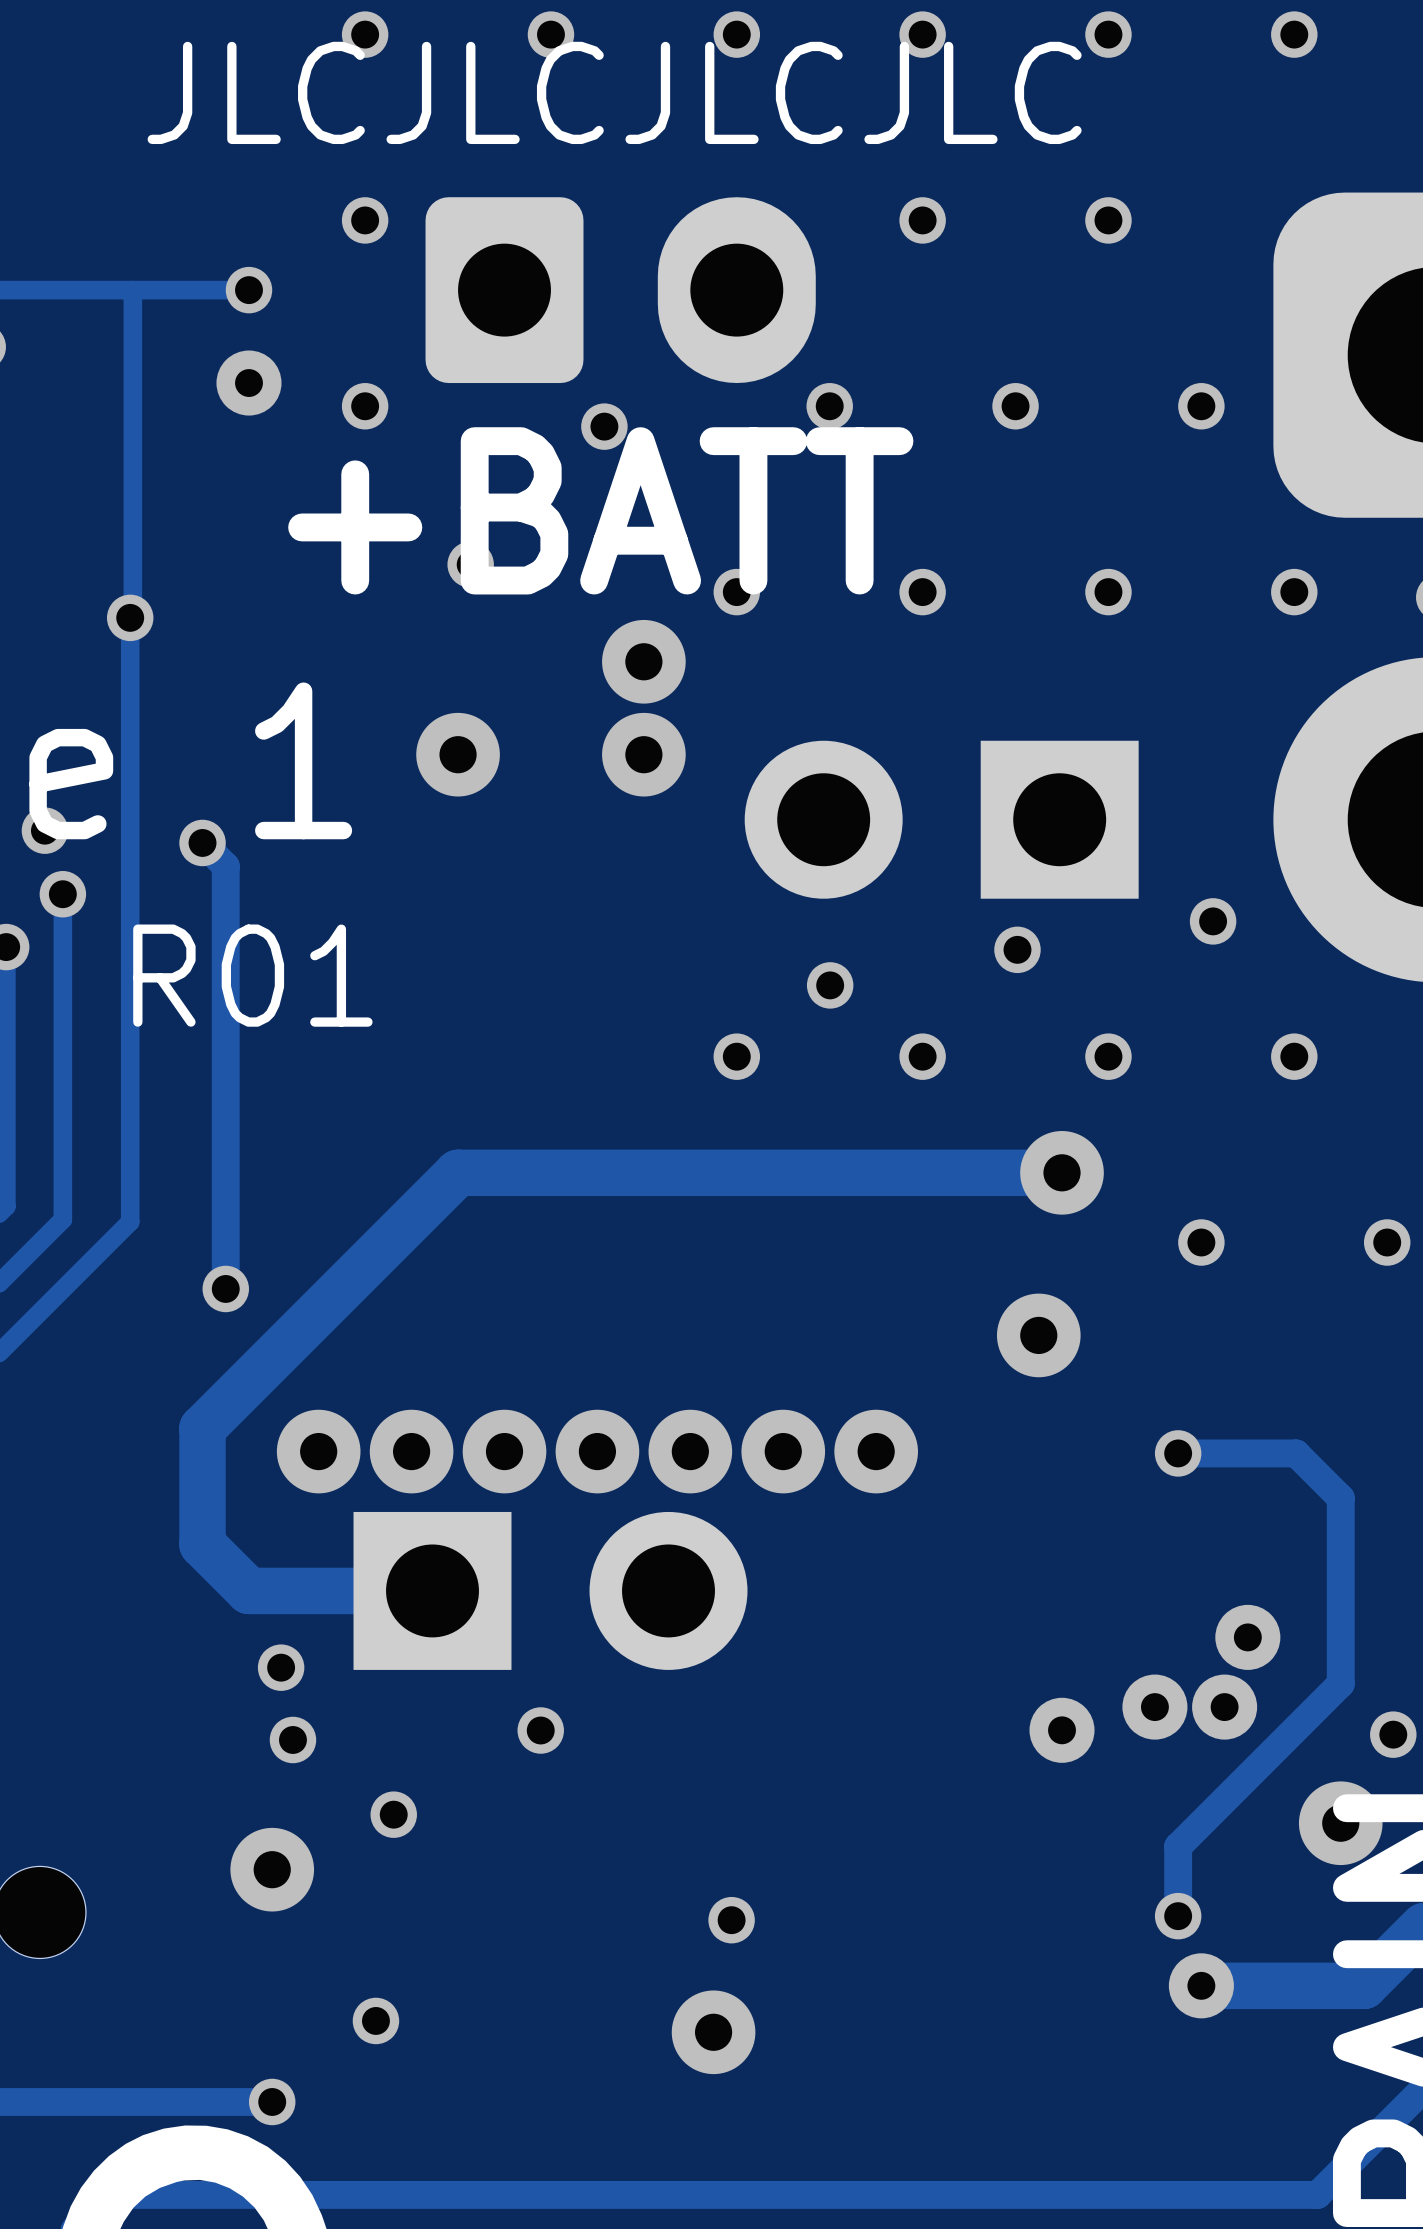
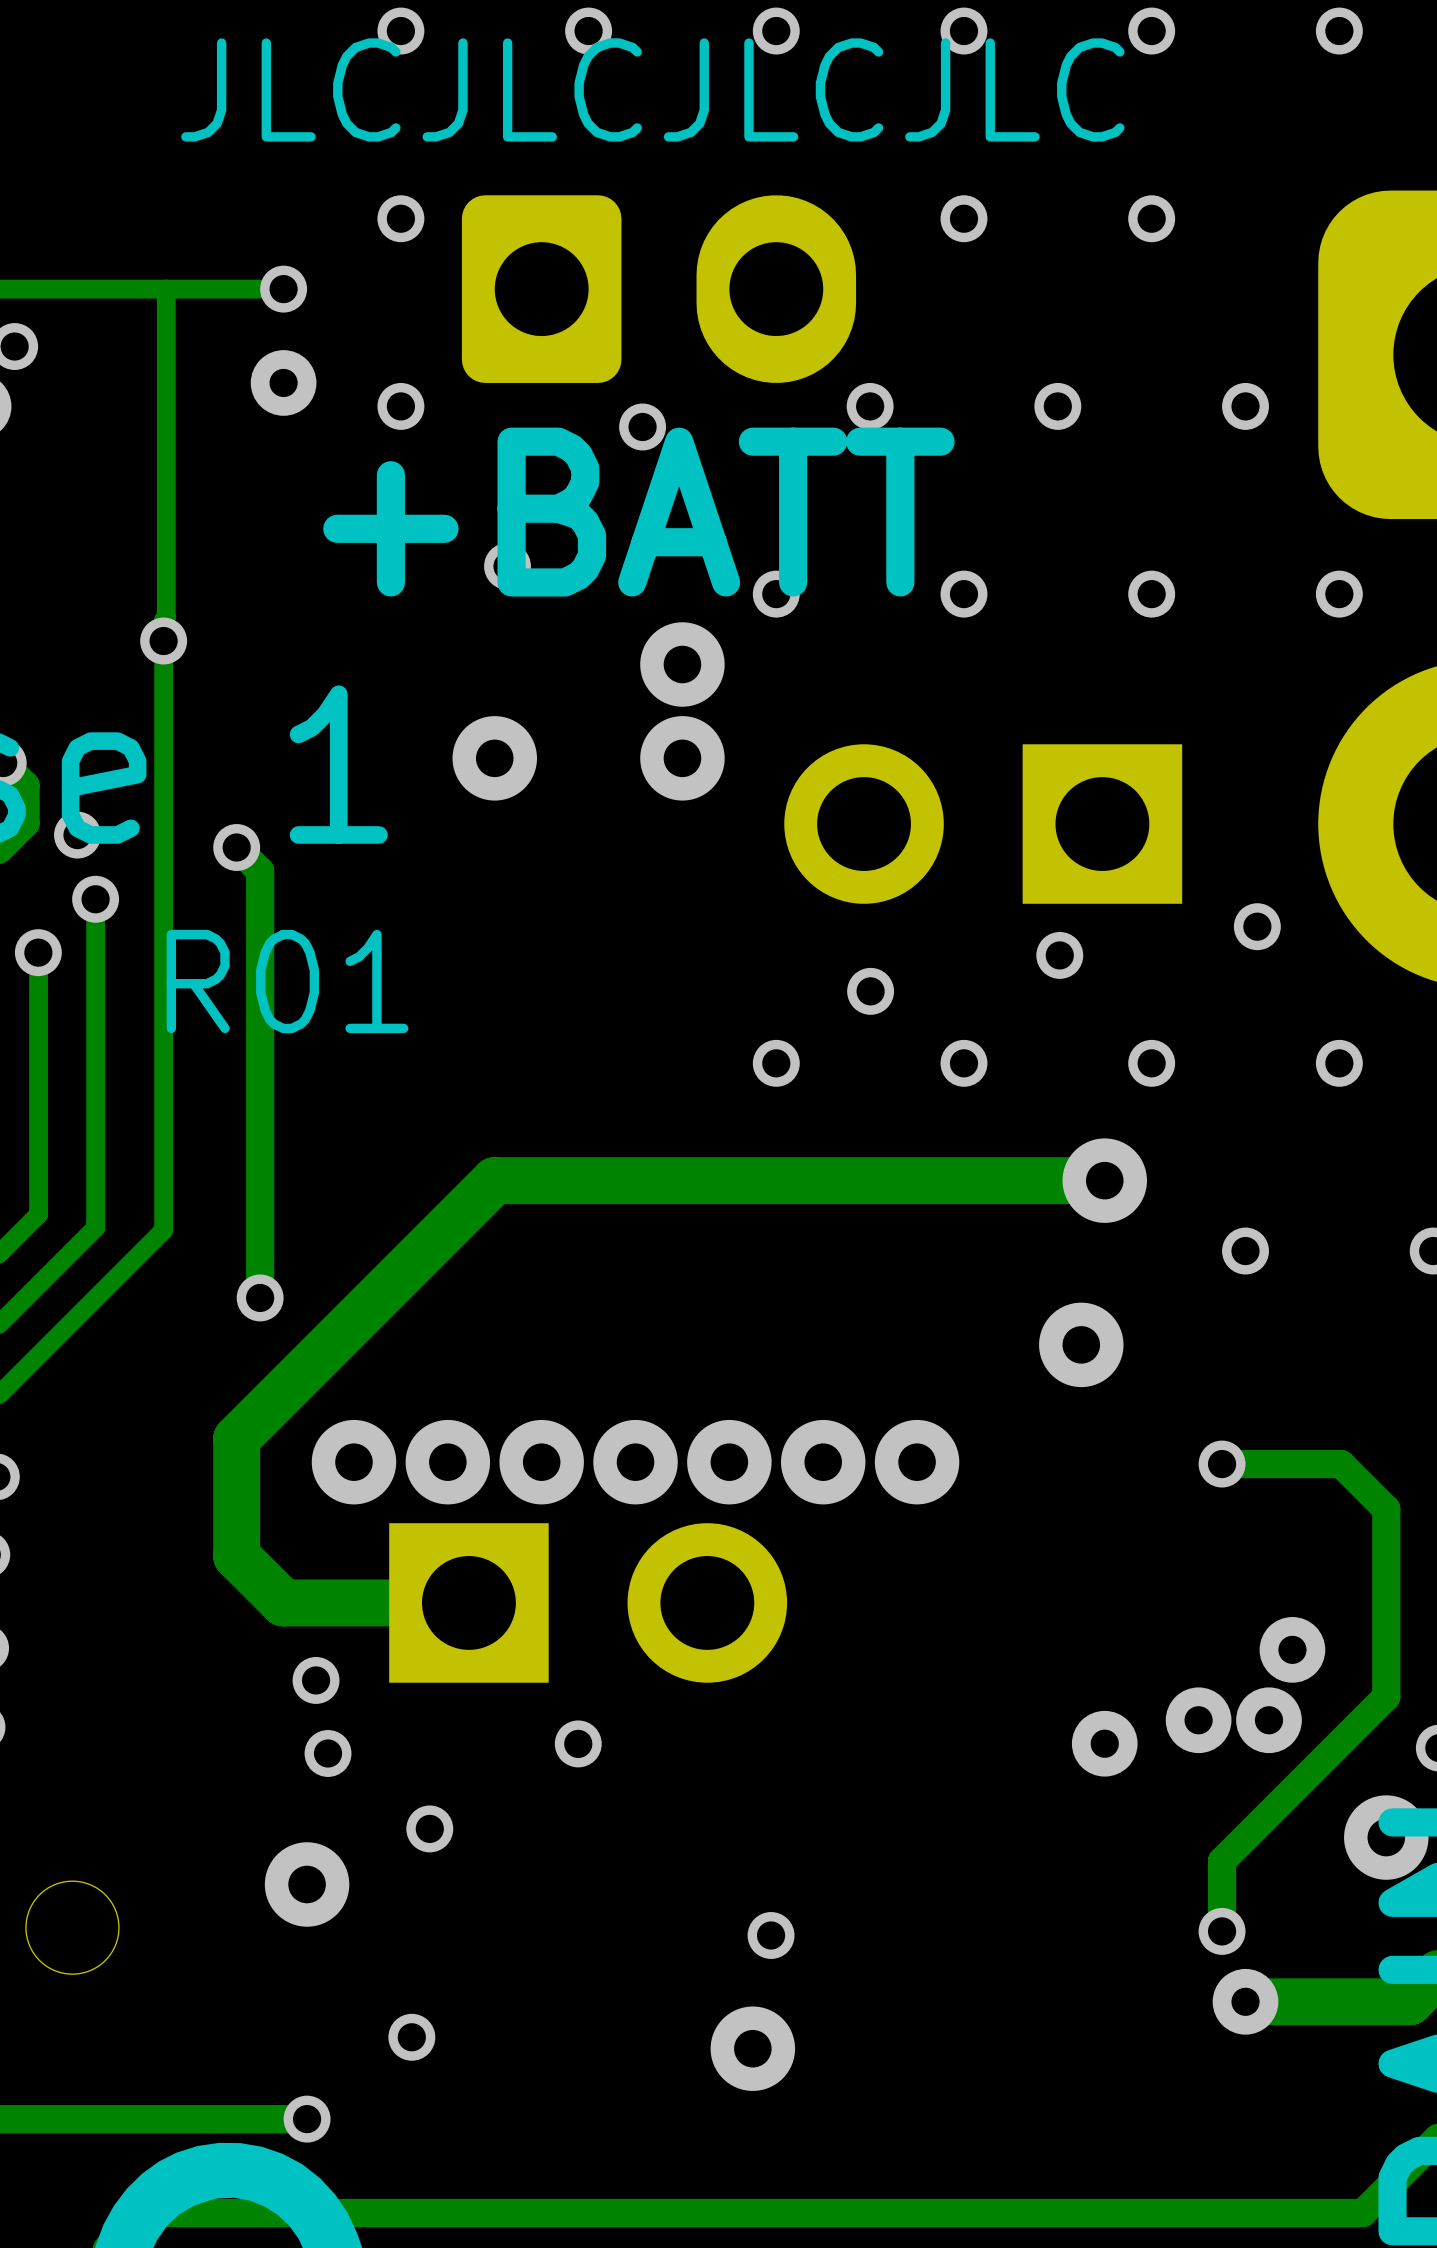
via position: (130, 617) -> (163, 641)

